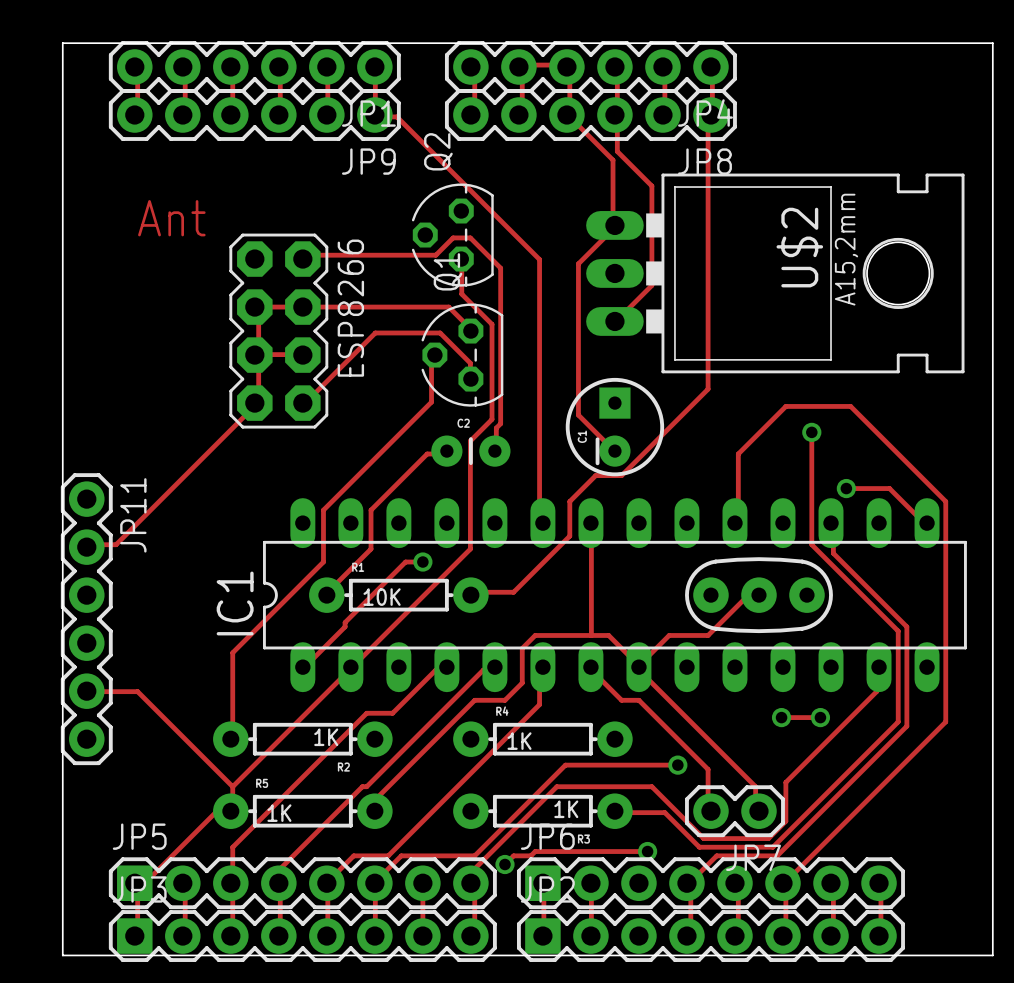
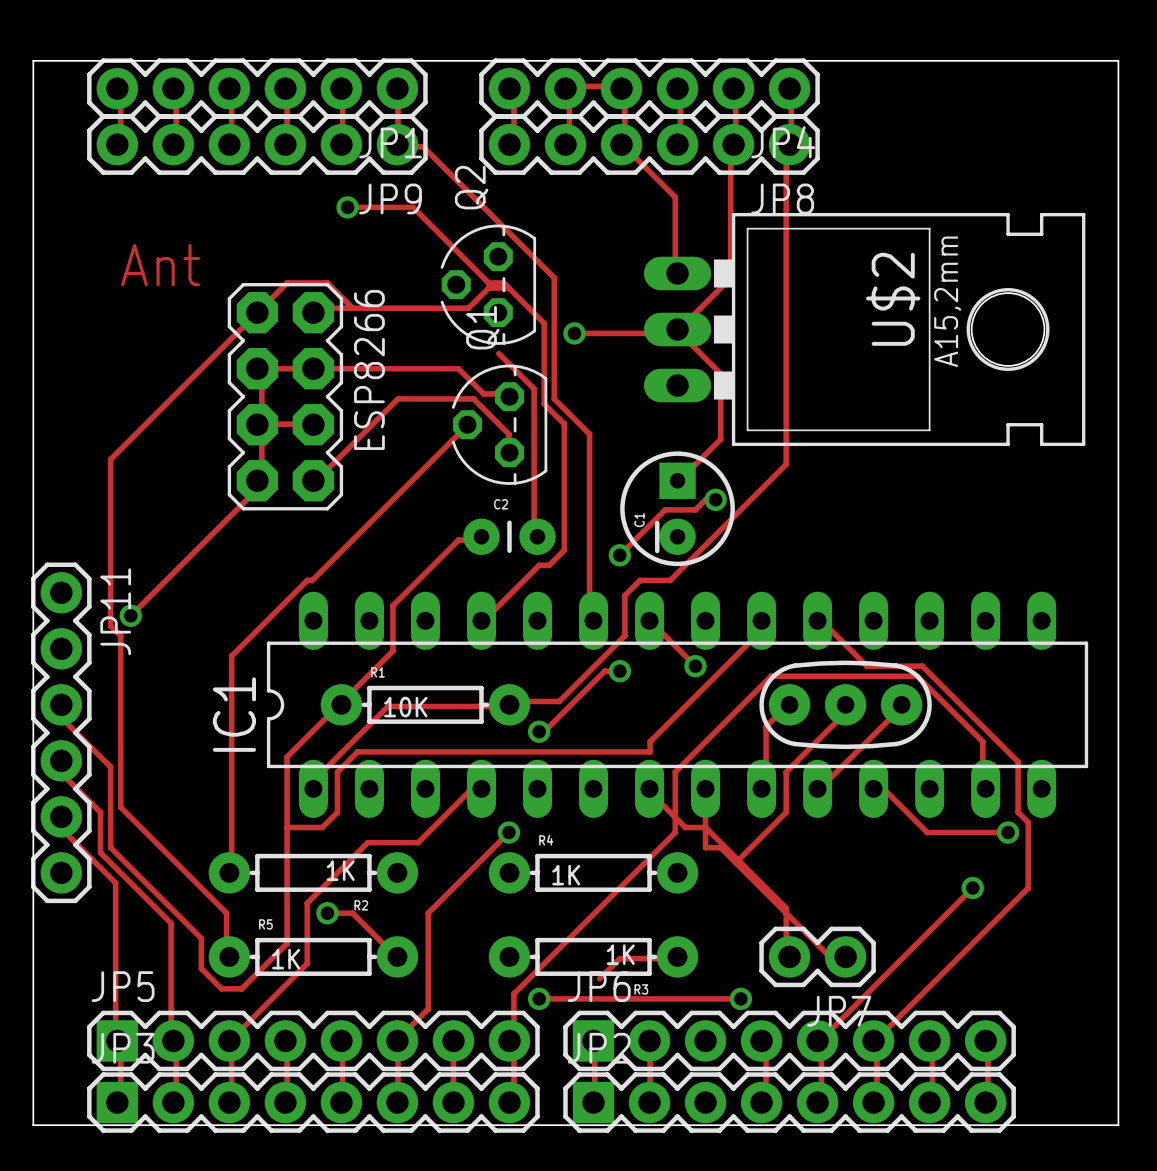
track: (614, 115) (617, 116) (617, 151) (651, 186) (651, 285) (614, 321) -> none
track: none -> (733, 144) (730, 146) (730, 277) (677, 329)
track: none -> (347, 207) (413, 207) (488, 283) (503, 283) (508, 288)
via: none -> (347, 207)
track: (614, 225) (578, 263) (578, 415) (614, 451) -> none
track: (509, 229) (539, 259) (539, 363) -> (554, 277) (554, 398) (589, 434)
track: none -> (352, 308) (327, 283) (287, 283) (110, 459) (110, 625) (120, 635) (120, 807) (226, 913) (226, 953) (229, 956)
track: (461, 259) (461, 294) -> none
track: none -> (677, 329) (720, 373) (720, 439) (677, 480)
track: none -> (677, 329) (675, 333) (574, 333)
via: none -> (574, 333)
track: (427, 307) (448, 307) (470, 328) -> (458, 368) (483, 393) (508, 393)
track: (500, 337) (500, 423) (496, 428) (494, 451) -> (534, 499) (534, 535) (537, 536)
track: none -> (544, 404) (564, 424) (564, 550) (549, 565) (539, 565) (483, 620) (481, 620)
track: (431, 358) (431, 402) (323, 510) (323, 562) (232, 652) -> (463, 429) (312, 580) (307, 580) (231, 656) (231, 772)
track: (254, 403) (254, 406) (116, 544) (90, 544) (86, 547) -> (257, 480) (261, 484) (130, 615)
track: (492, 419) (470, 441) (470, 549) (232, 786) -> none
track: none -> (715, 499) (705, 499) (695, 509) (665, 509) (619, 555)
via: none -> (715, 499)
track: (811, 432) (811, 544) (898, 631) (898, 721) (867, 752) -> none
via: (811, 432) -> none
via: none -> (619, 555)
track: (621, 475) (595, 475) (582, 488) -> (685, 565) (670, 580) (640, 580)
track: (846, 488) (889, 488) (924, 523) (927, 523) -> none
via: (846, 488) -> none
via: none -> (130, 615)
track: (591, 523) (591, 626) -> (650, 620) (695, 666)
track: none -> (761, 620) (761, 630) (650, 741)
track: (738, 523) (738, 453) (785, 406) (850, 406) (945, 501) (945, 721) (915, 752) -> (1018, 812) (1028, 822) (1028, 888)
track: (831, 523) (833, 523) (833, 553) (906, 626) (906, 644) -> (821, 620) (866, 666) (922, 666) (1018, 761)
track: (422, 562) (405, 562) (345, 622) (345, 626) (306, 665) -> (509, 704) (508, 706) (387, 706) (317, 777) (317, 787)
via: (422, 562) -> none
via: none -> (695, 666)
track: none -> (619, 671) (604, 671) (544, 731) (539, 731)
via: none -> (619, 671)
track: none -> (341, 704) (337, 706) (287, 756) (287, 943)
track: none -> (789, 704) (766, 726) (766, 787) (761, 788)
track: none -> (901, 704) (902, 706) (821, 787) (817, 788)
track: (755, 596) (746, 596) (708, 635) (669, 635) (638, 665) (608, 635) (591, 635) -> (841, 706) (841, 716) (786, 772) (786, 812) (735, 862)
via: none -> (539, 731)
track: (535, 635) (522, 648) (522, 683) (504, 700) (474, 700) (470, 704) -> (584, 751) (357, 751) (337, 772) (337, 812) (322, 827) (287, 827)
track: none -> (61, 760) (65, 761) (65, 777) (100, 812) (100, 852) (171, 923) (171, 1039) (173, 1040)
track: (494, 667) (492, 670) (483, 670) (366, 786) (362, 786) (280, 868) (278, 883) -> none
track: (542, 667) (539, 670) (539, 704) (388, 855) (353, 855) (326, 883) -> none
track: none -> (873, 788) (876, 792) (887, 792) (927, 832) (1008, 832)
track: (879, 667) (876, 670) (876, 691) (785, 782) (785, 821) (768, 838) (703, 838) (651, 786) (556, 786) (474, 868) -> (985, 788) (982, 787) (982, 741) (917, 676) (771, 676) (675, 772) (675, 832) (513, 993) (513, 1024)
track: (638, 670) (755, 786) (755, 808) -> (705, 792) (705, 847) (720, 847) (826, 953) (841, 953)
track: (906, 687) (906, 726) (777, 855) (716, 855) (690, 881) (686, 883) -> none
track: (90, 691) (137, 691) (232, 786) -> (65, 817) (65, 832) (115, 882) (115, 1039) (117, 1040)
via: none -> (508, 832)
via: none -> (1008, 832)
track: (366, 713) (280, 799) -> (387, 842) (367, 842) (307, 903) (307, 963) (231, 1039)
track: (781, 717) (820, 717) -> none
via: (781, 717) -> none
via: (820, 717) -> none
via: none -> (972, 888)
track: (677, 765) (565, 765) (474, 855) (401, 855) -> none
via: (677, 765) -> none
track: none -> (327, 913) (352, 913) (397, 956)
via: none -> (327, 913)
track: (401, 773) (375, 799) (374, 811) -> (428, 913) (428, 1009)
track: (232, 786) (232, 808) (230, 811) (215, 812) (146, 881) (134, 883) -> none
track: (614, 811) (664, 812) (699, 847) (772, 847) -> (817, 1040) (861, 998)
track: none -> (677, 956) (675, 958) (619, 958) (599, 978)
track: (241, 838) (232, 847) (232, 881) -> (241, 988) (221, 988) (201, 968) (201, 938) (110, 847) (110, 767) (65, 721) (65, 706) (61, 704)
track: none -> (539, 998) (740, 998)
track: (647, 851) (535, 851) (530, 855) (513, 855) (504, 864) -> none
via position: (647, 851) -> (740, 998)
via position: (504, 864) -> (539, 998)

